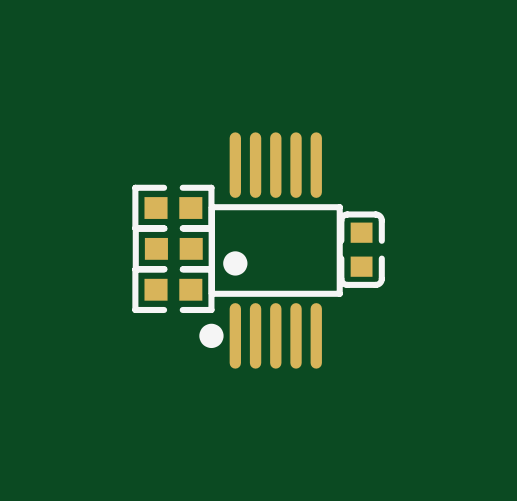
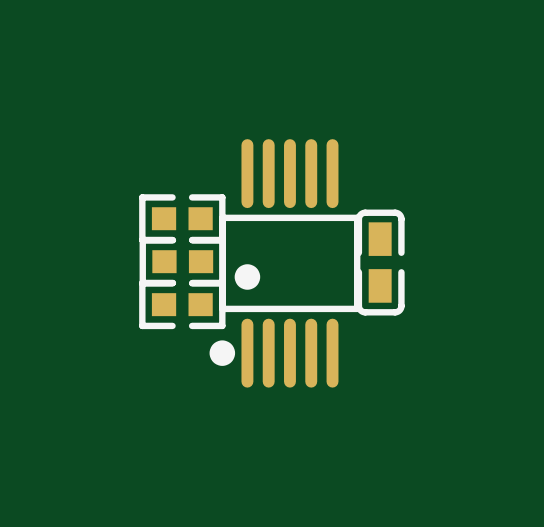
part footprint: [338, 211, 385, 288] -> [355, 209, 405, 316]

